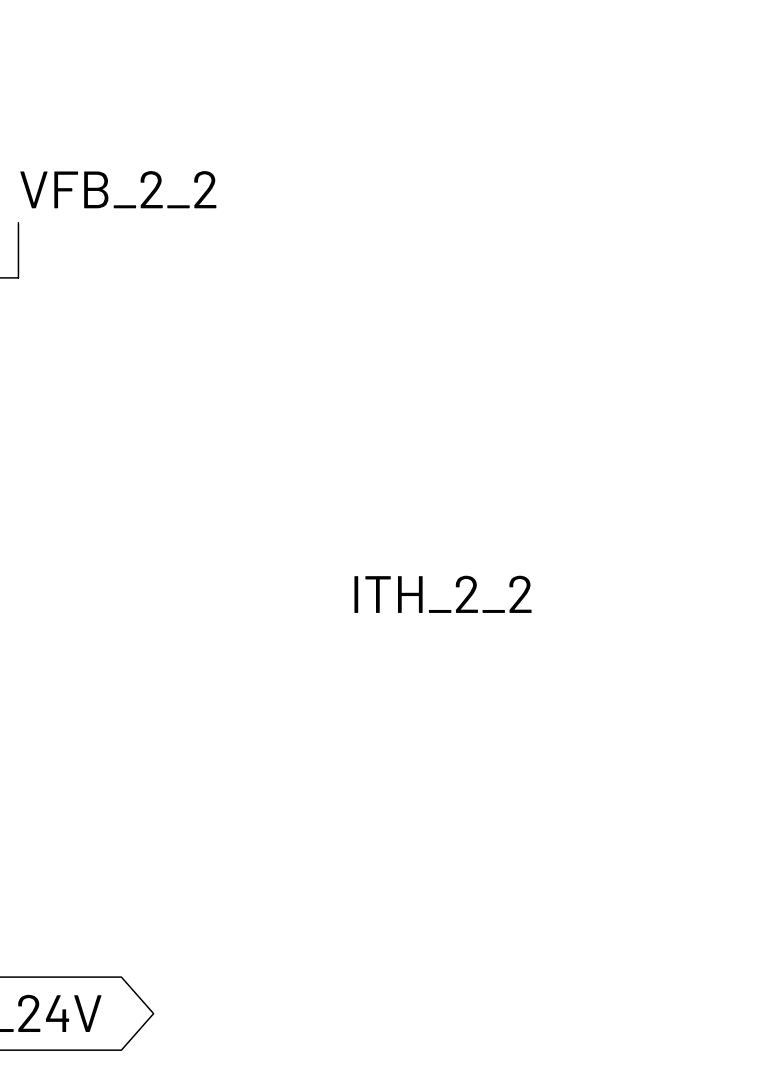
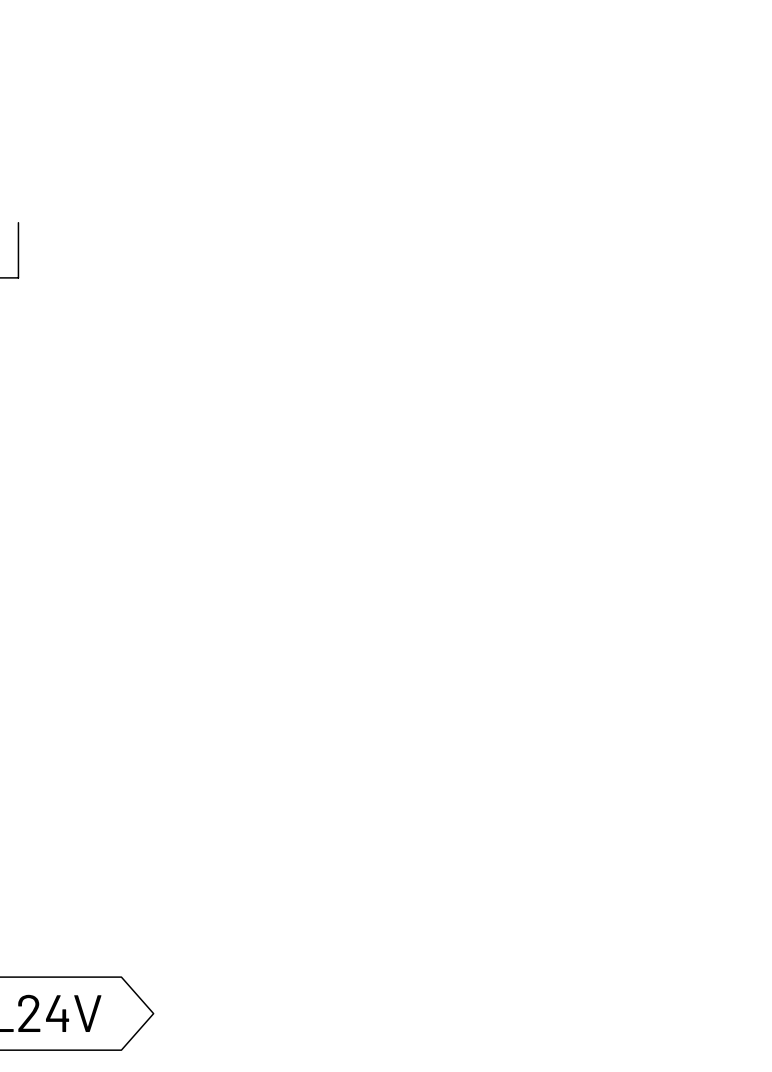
label: VFB_2_2 (118, 189) -> none
label: ITH_2_2 (443, 594) -> none

